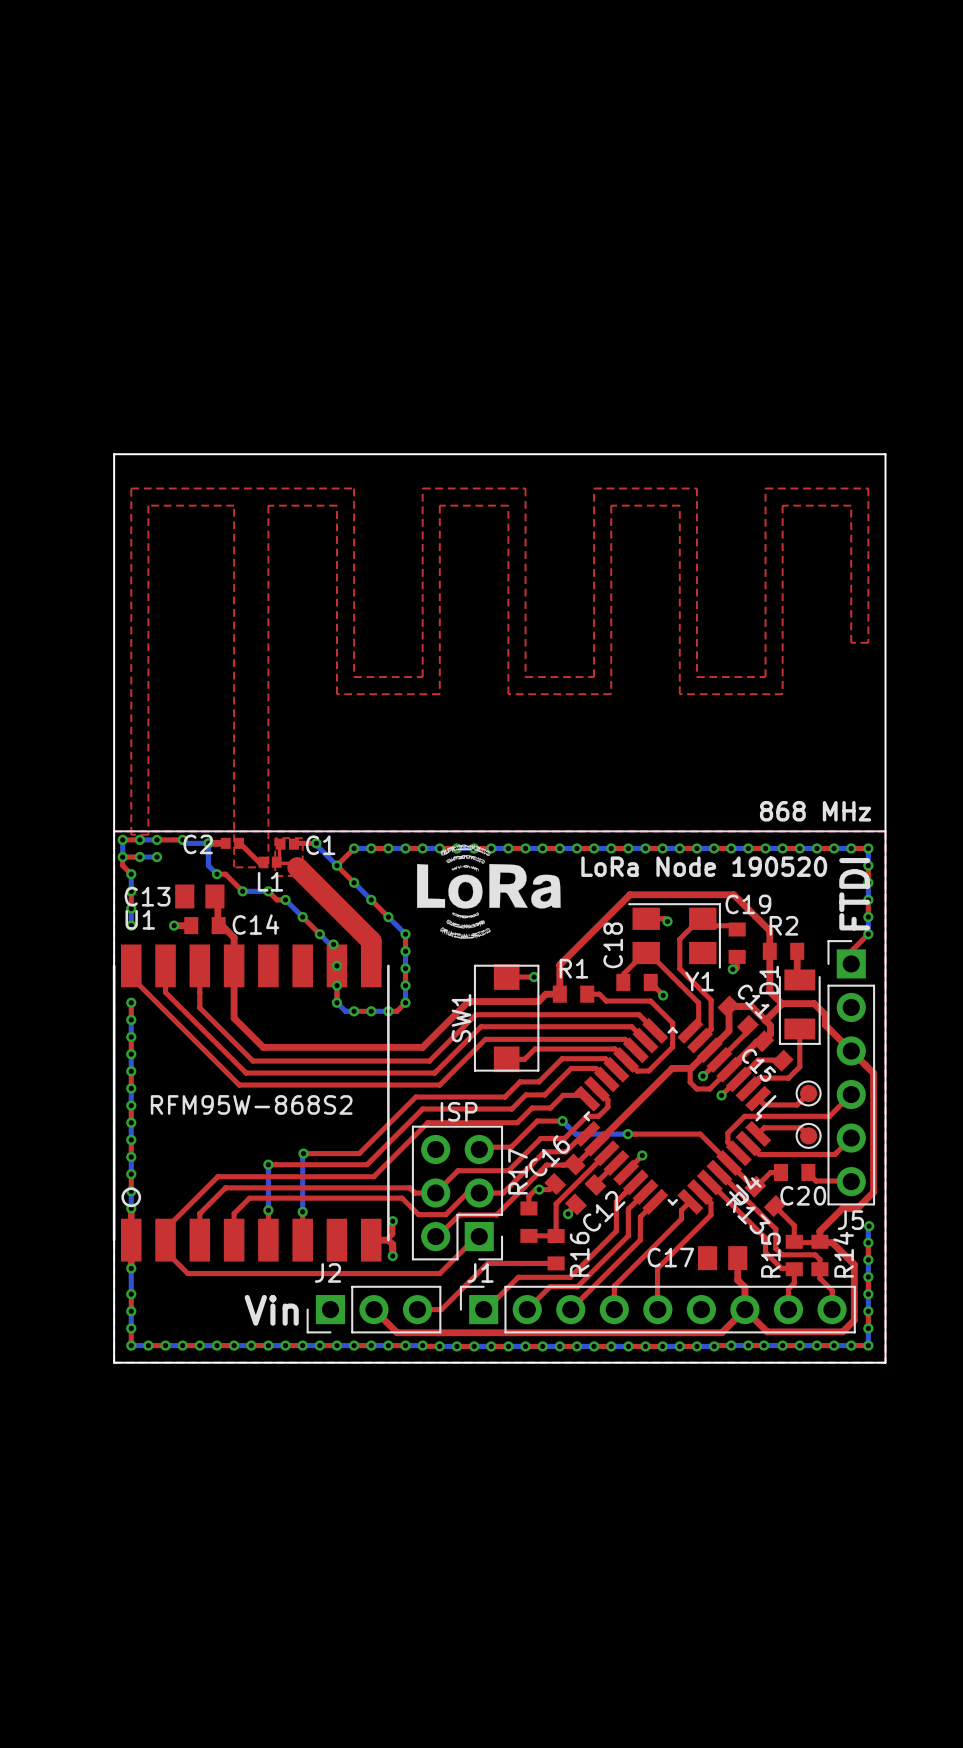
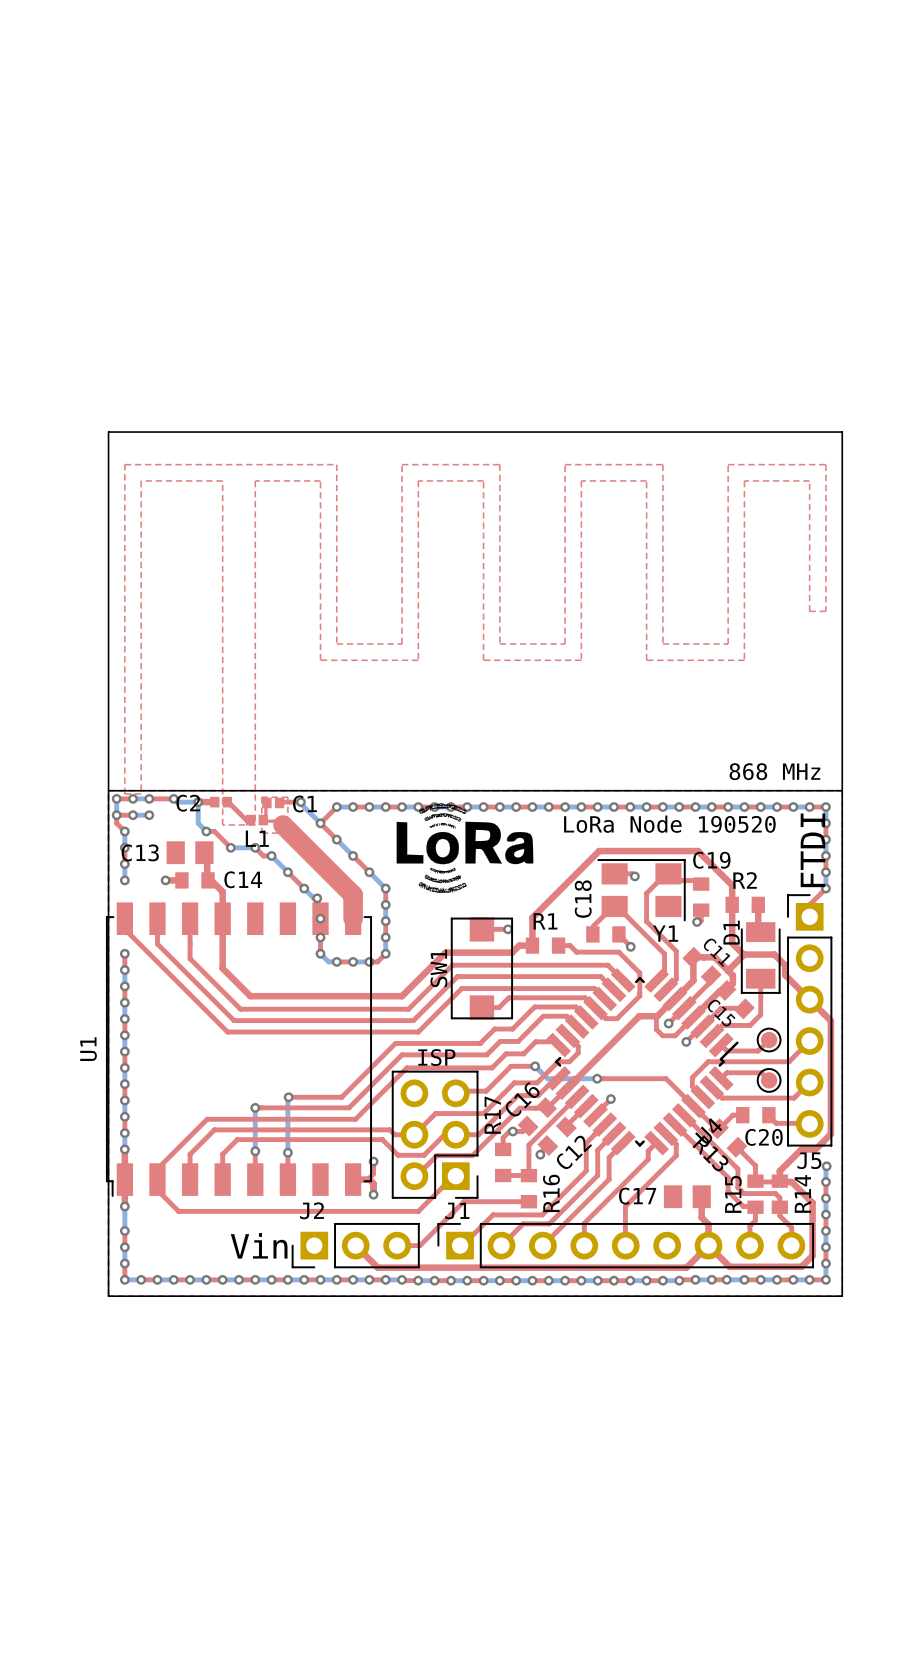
U1 name position: U1 (140, 919) -> U1 (88, 1049)
U1 footprint: [112, 944, 390, 1262] -> [105, 902, 373, 1197]
U1 value: RFM95W-868S2 (251, 1104) -> none

